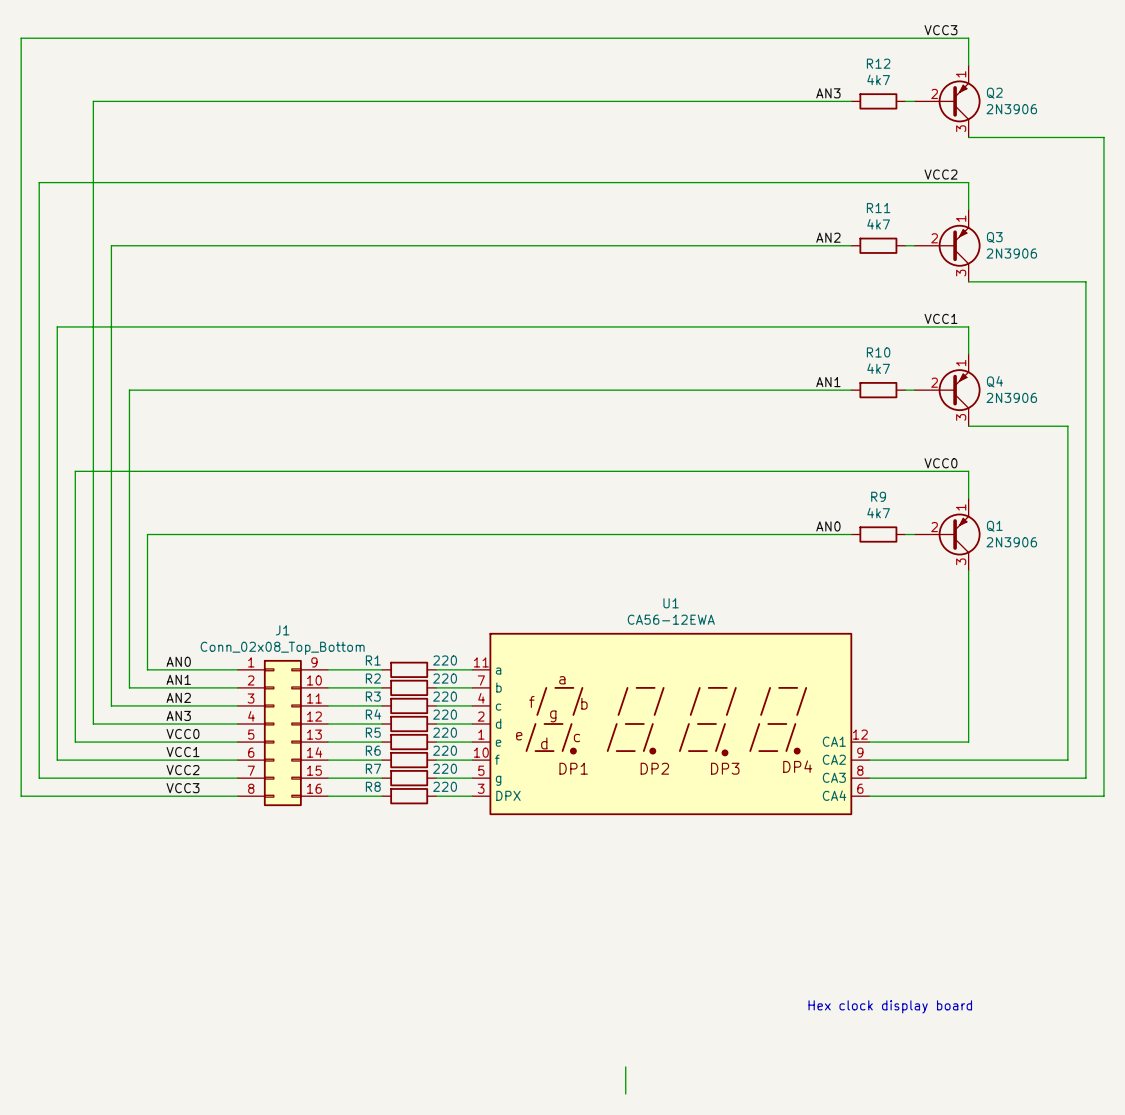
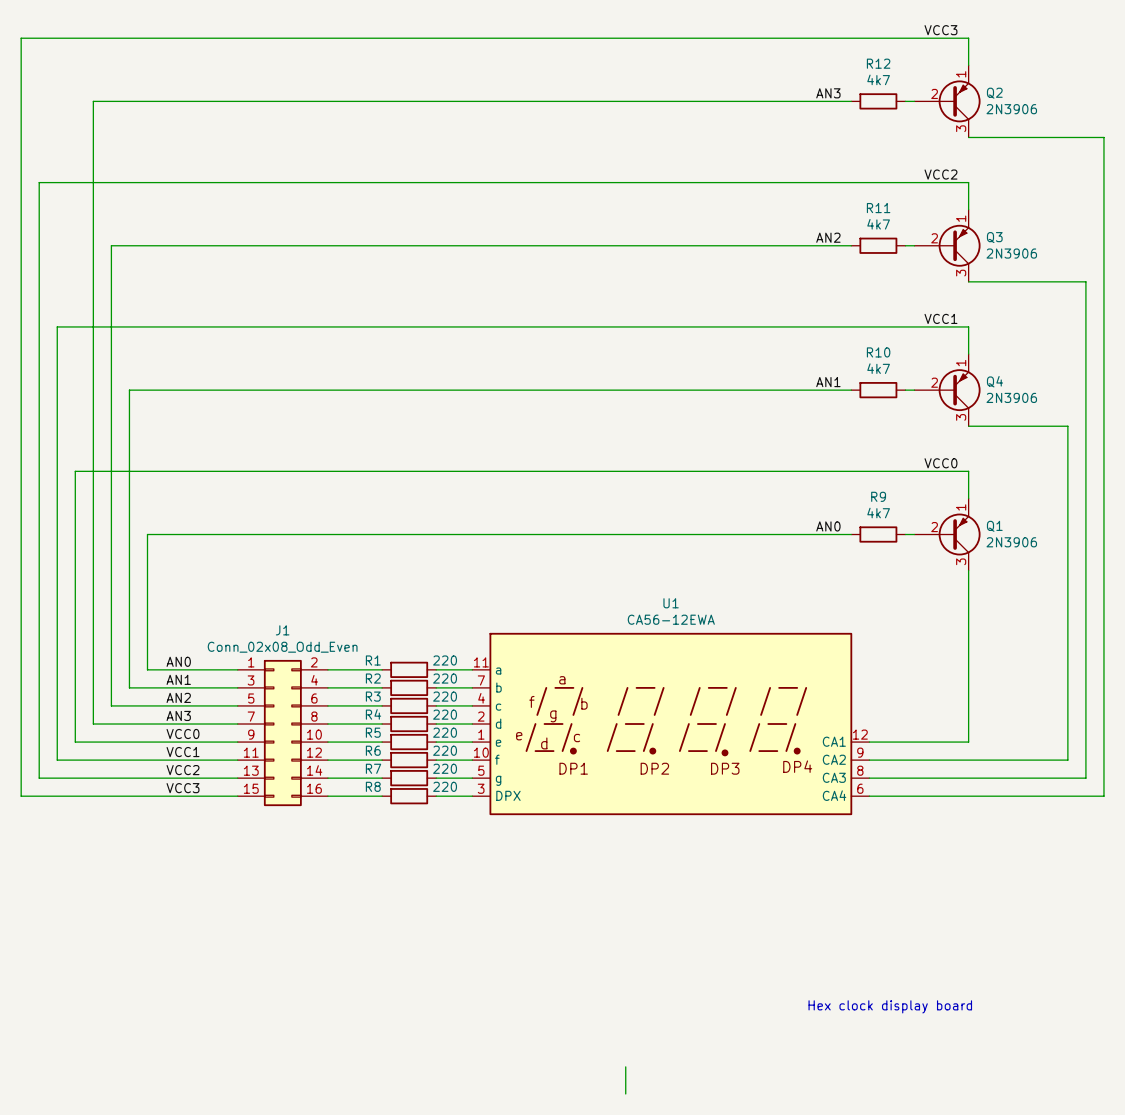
J1 value: Conn_02x08_Top_Bottom (282, 648) -> Conn_02x08_Odd_Even (282, 647)
J1 symbol: [237, 659, 328, 807] -> [237, 659, 328, 807]

